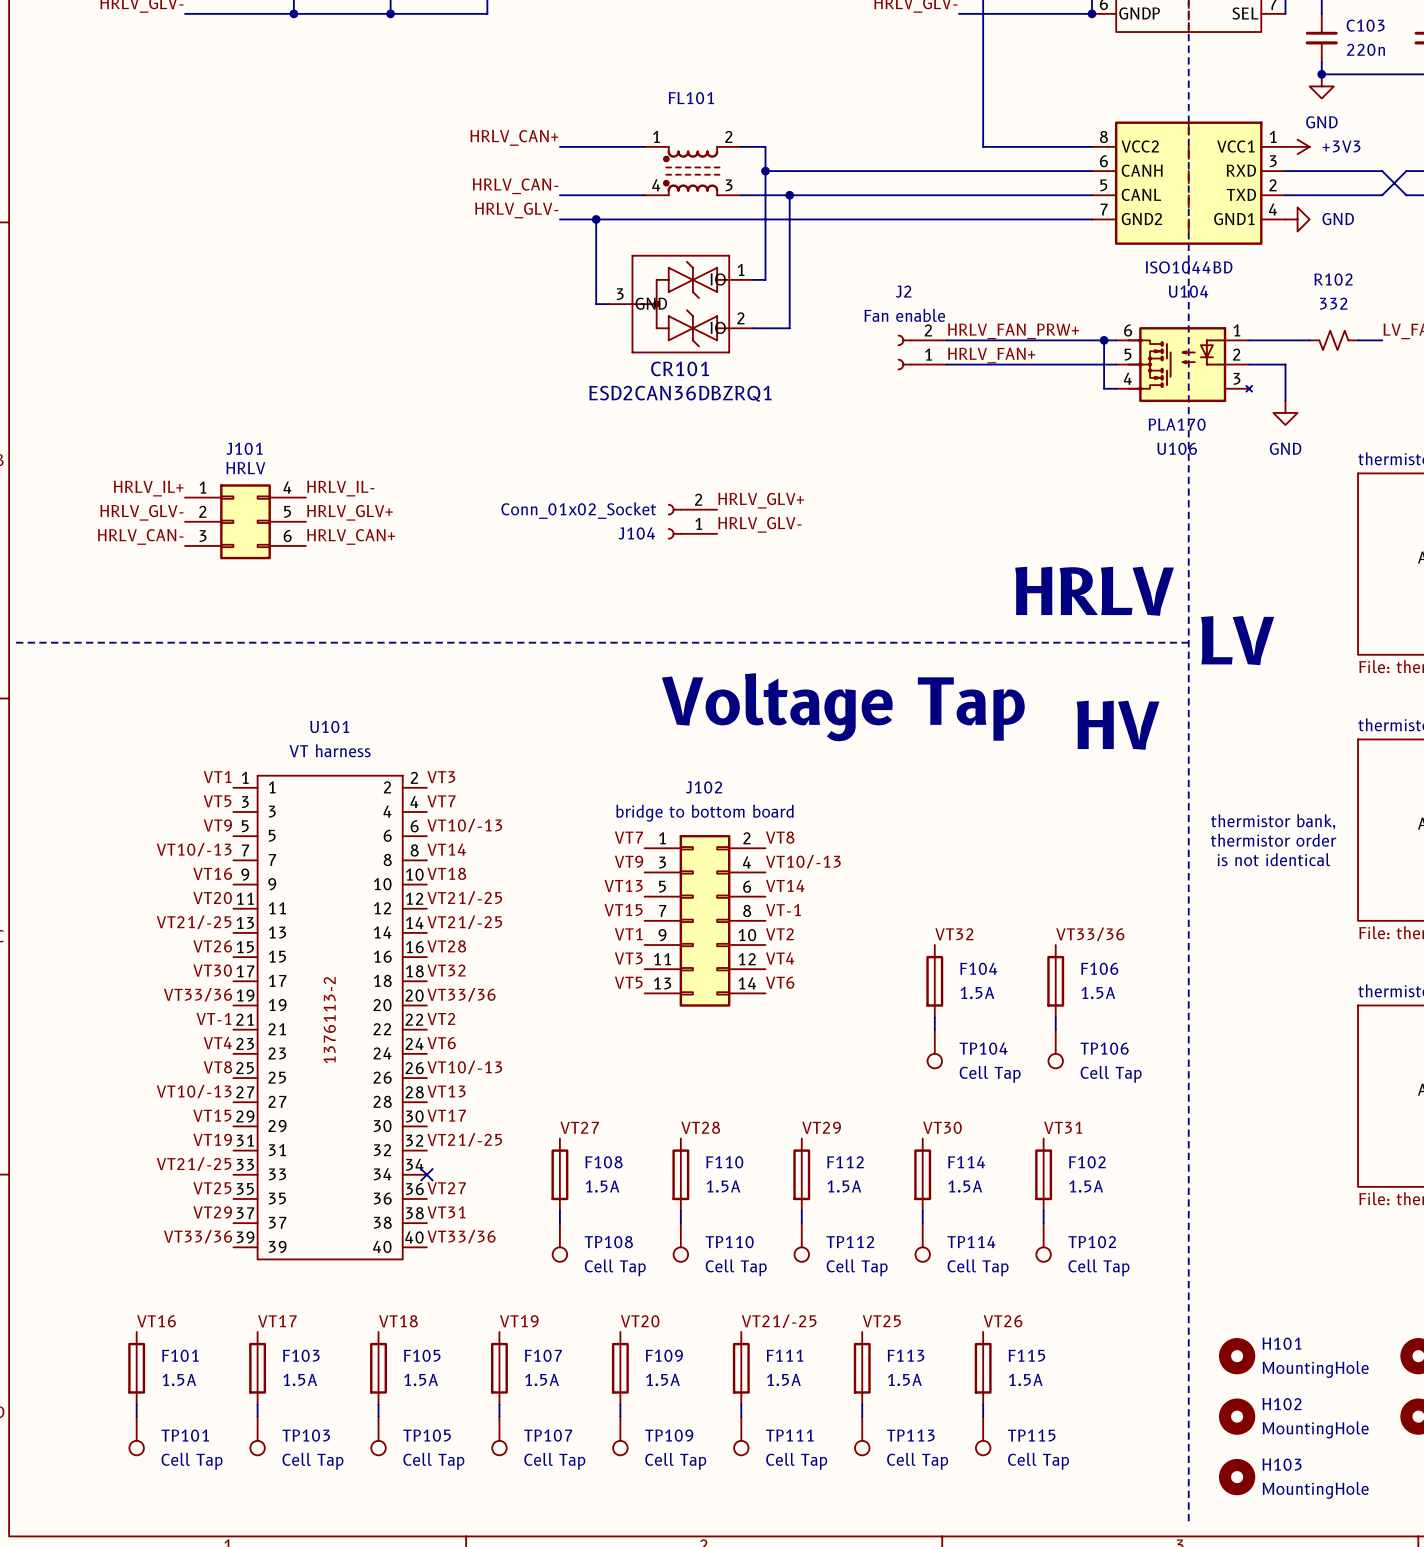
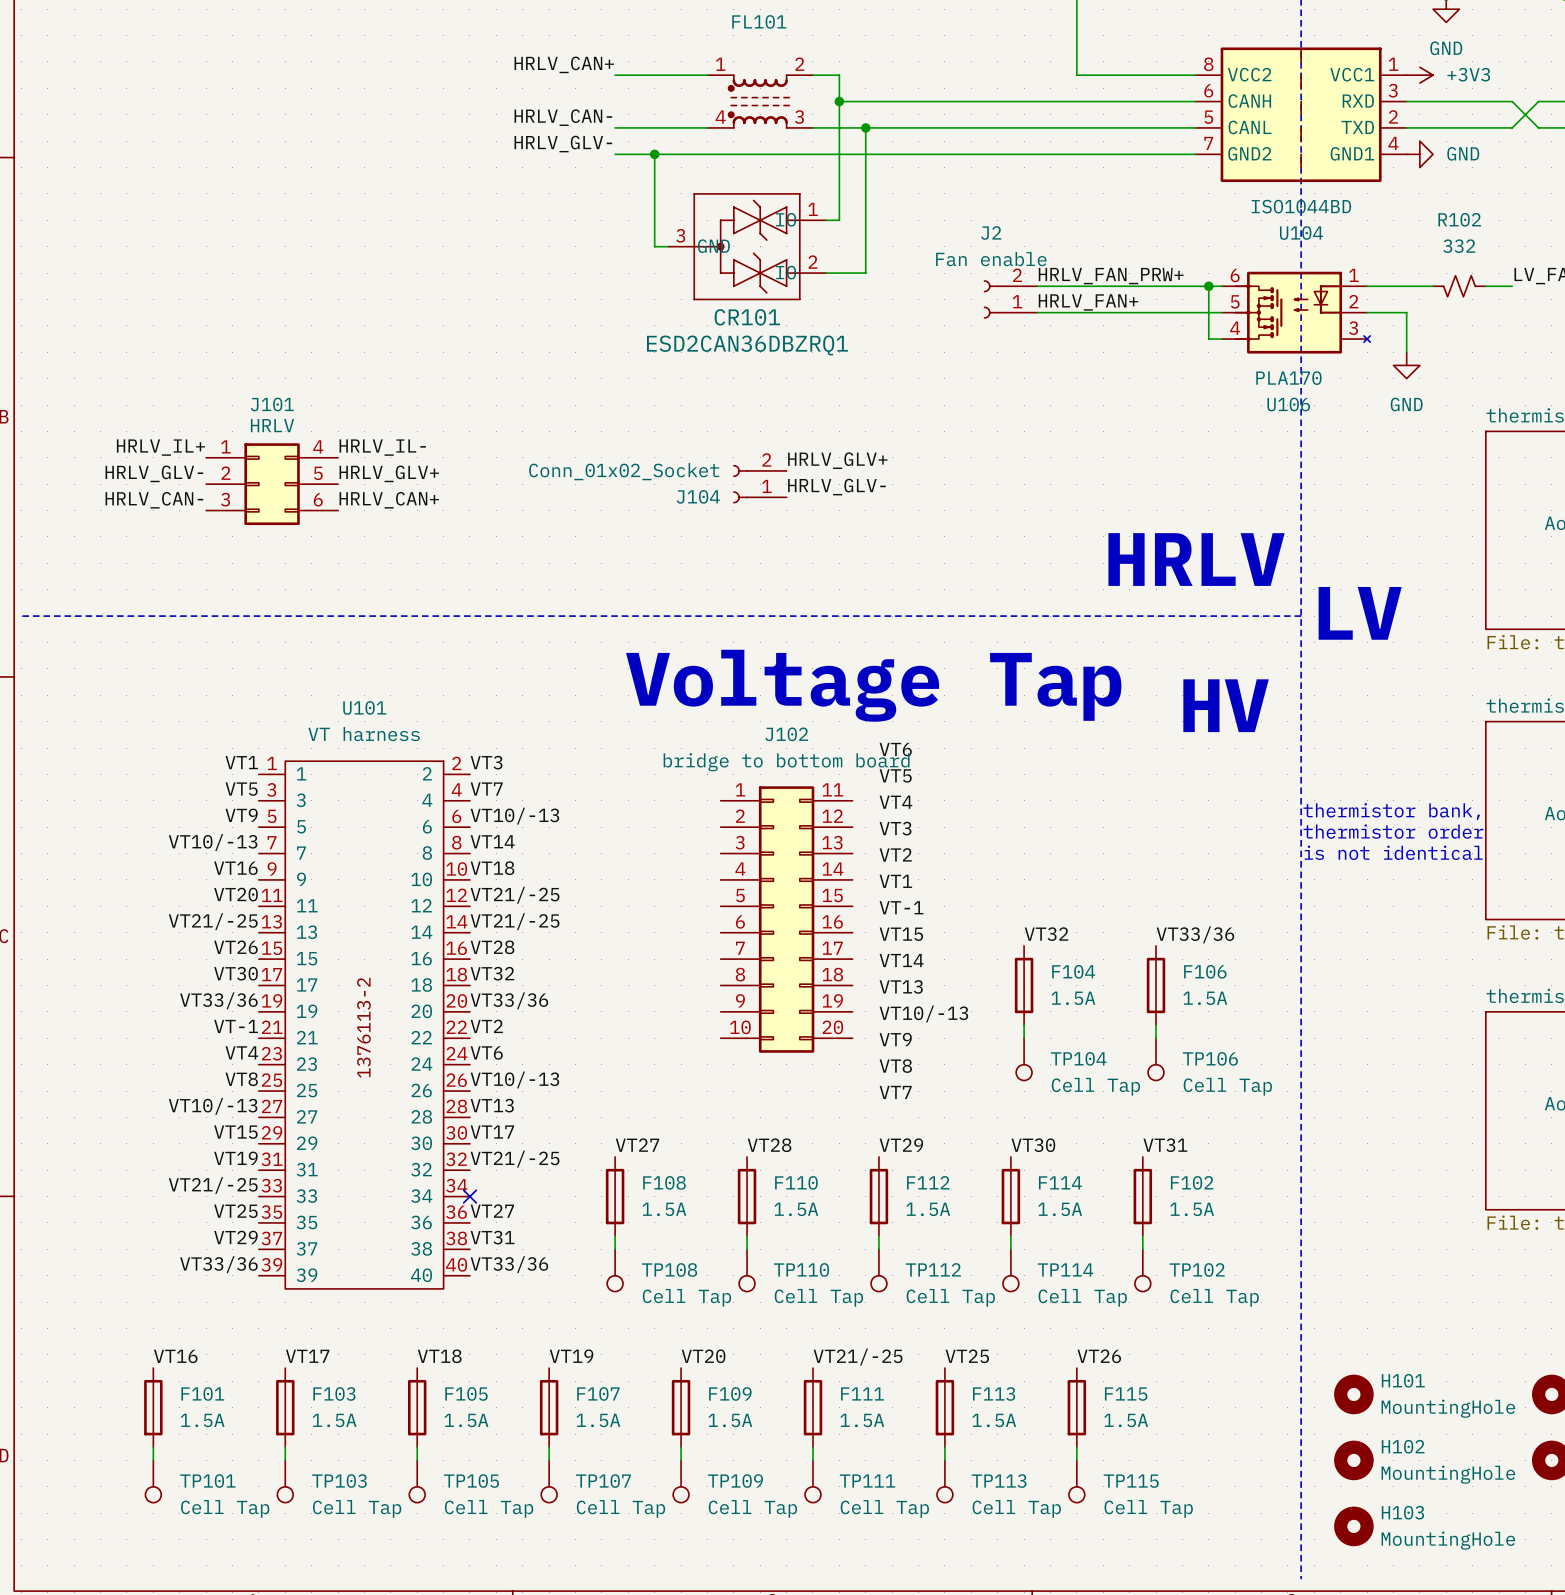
J102 name position: J102 (704, 787) -> J102 (786, 734)
label: none -> VT5 (895, 775)
J102 value position: bridge to bottom board (705, 813) -> bridge to bottom board (786, 762)
J102 symbol: [644, 834, 766, 1007] -> [720, 786, 853, 1053]
label: VT7 (628, 837) -> none
label position: VT8 (780, 837) -> VT8 (895, 1066)
label position: VT9 (629, 861) -> VT9 (895, 1039)
label position: VT10/-13 (803, 861) -> VT10/-13 (923, 1014)
label position: VT13 (623, 885) -> VT13 (901, 986)
label position: VT14 (785, 885) -> VT14 (901, 960)
label position: VT15 (623, 910) -> VT15 (901, 934)
label position: VT-1 (783, 910) -> VT-1 (901, 907)
label position: VT1 (628, 934) -> VT1 (895, 881)
label position: VT2 (779, 934) -> VT2 (895, 854)
label position: VT3 (628, 958) -> VT3 (895, 828)
label position: VT4 (780, 958) -> VT4 (895, 802)
label: VT5 (628, 982) -> none
label position: VT6 (780, 982) -> VT6 (895, 749)
label: none -> VT7 (895, 1092)

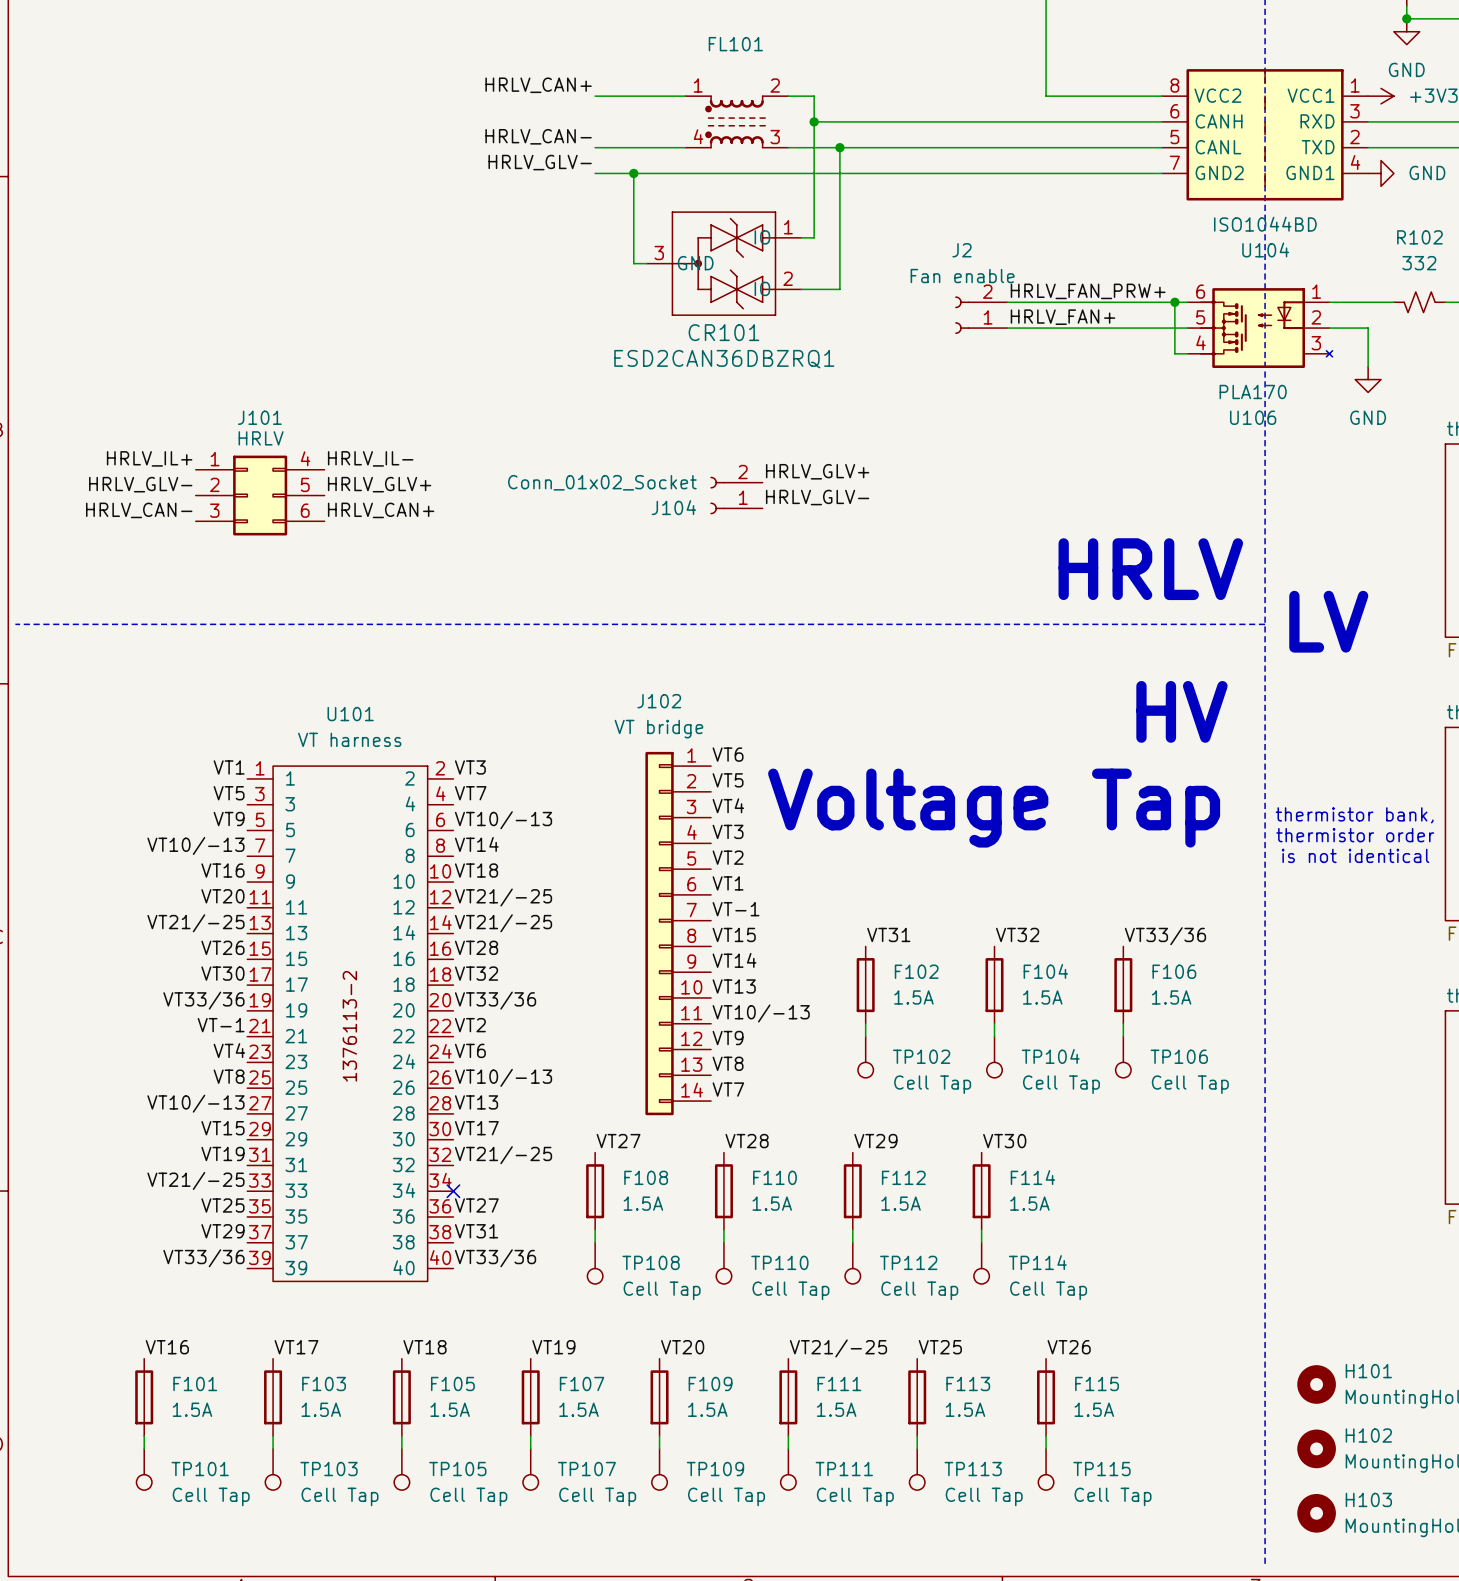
text position: Voltage Tap (873, 685) -> Voltage Tap (994, 808)
J102 name position: J102 (786, 734) -> J102 (659, 701)
label position: VT6 (895, 749) -> VT6 (728, 754)
J102 value: bridge to bottom board (786, 762) -> VT bridge (658, 729)
label position: VT5 (895, 775) -> VT5 (728, 780)
J102 symbol: [720, 786, 853, 1053] -> [645, 751, 712, 1116]
label position: VT4 (895, 802) -> VT4 (728, 805)
label position: VT3 (895, 828) -> VT3 (728, 831)
label position: VT2 (895, 854) -> VT2 (728, 857)
label position: VT1 (895, 881) -> VT1 (728, 883)
label position: VT-1 (901, 907) -> VT-1 (736, 909)
label position: VT15 (901, 934) -> VT15 (734, 934)
label: none -> VT31 (888, 934)
label position: VT14 (901, 960) -> VT14 (734, 960)
label position: VT13 (901, 986) -> VT13 (734, 986)
label position: VT10/-13 (923, 1014) -> VT10/-13 (761, 1013)
wire: none -> (865, 1023) (865, 1036)
label position: VT9 (895, 1039) -> VT9 (728, 1038)
label position: VT8 (895, 1066) -> VT8 (728, 1063)
label position: VT7 (895, 1092) -> VT7 (728, 1089)
label: VT31 (1165, 1145) -> none
F102 position: (1142, 1196) -> (865, 985)
wire: (1142, 1236) (1142, 1249) -> none
TP102 position: (1142, 1270) -> (865, 1057)

